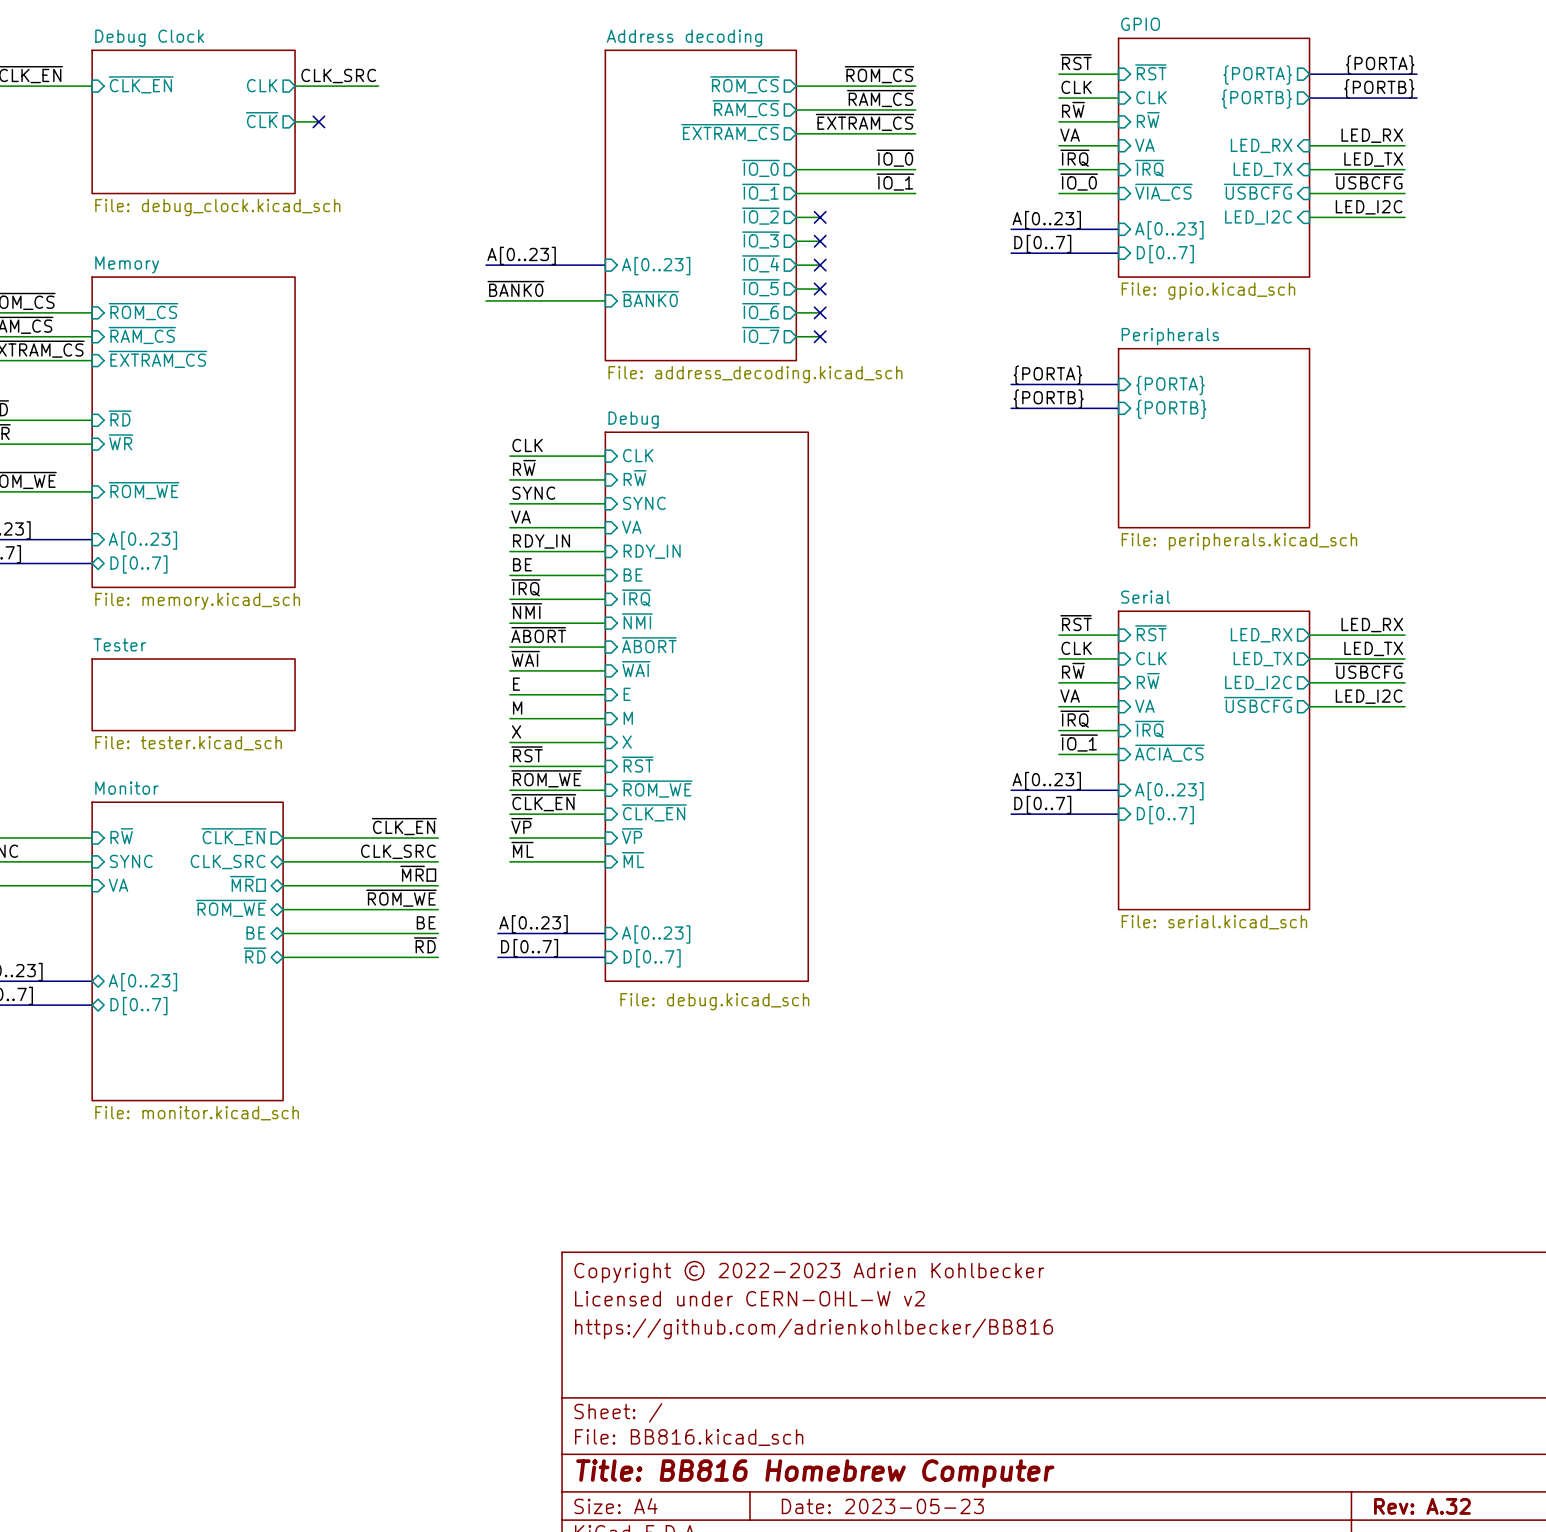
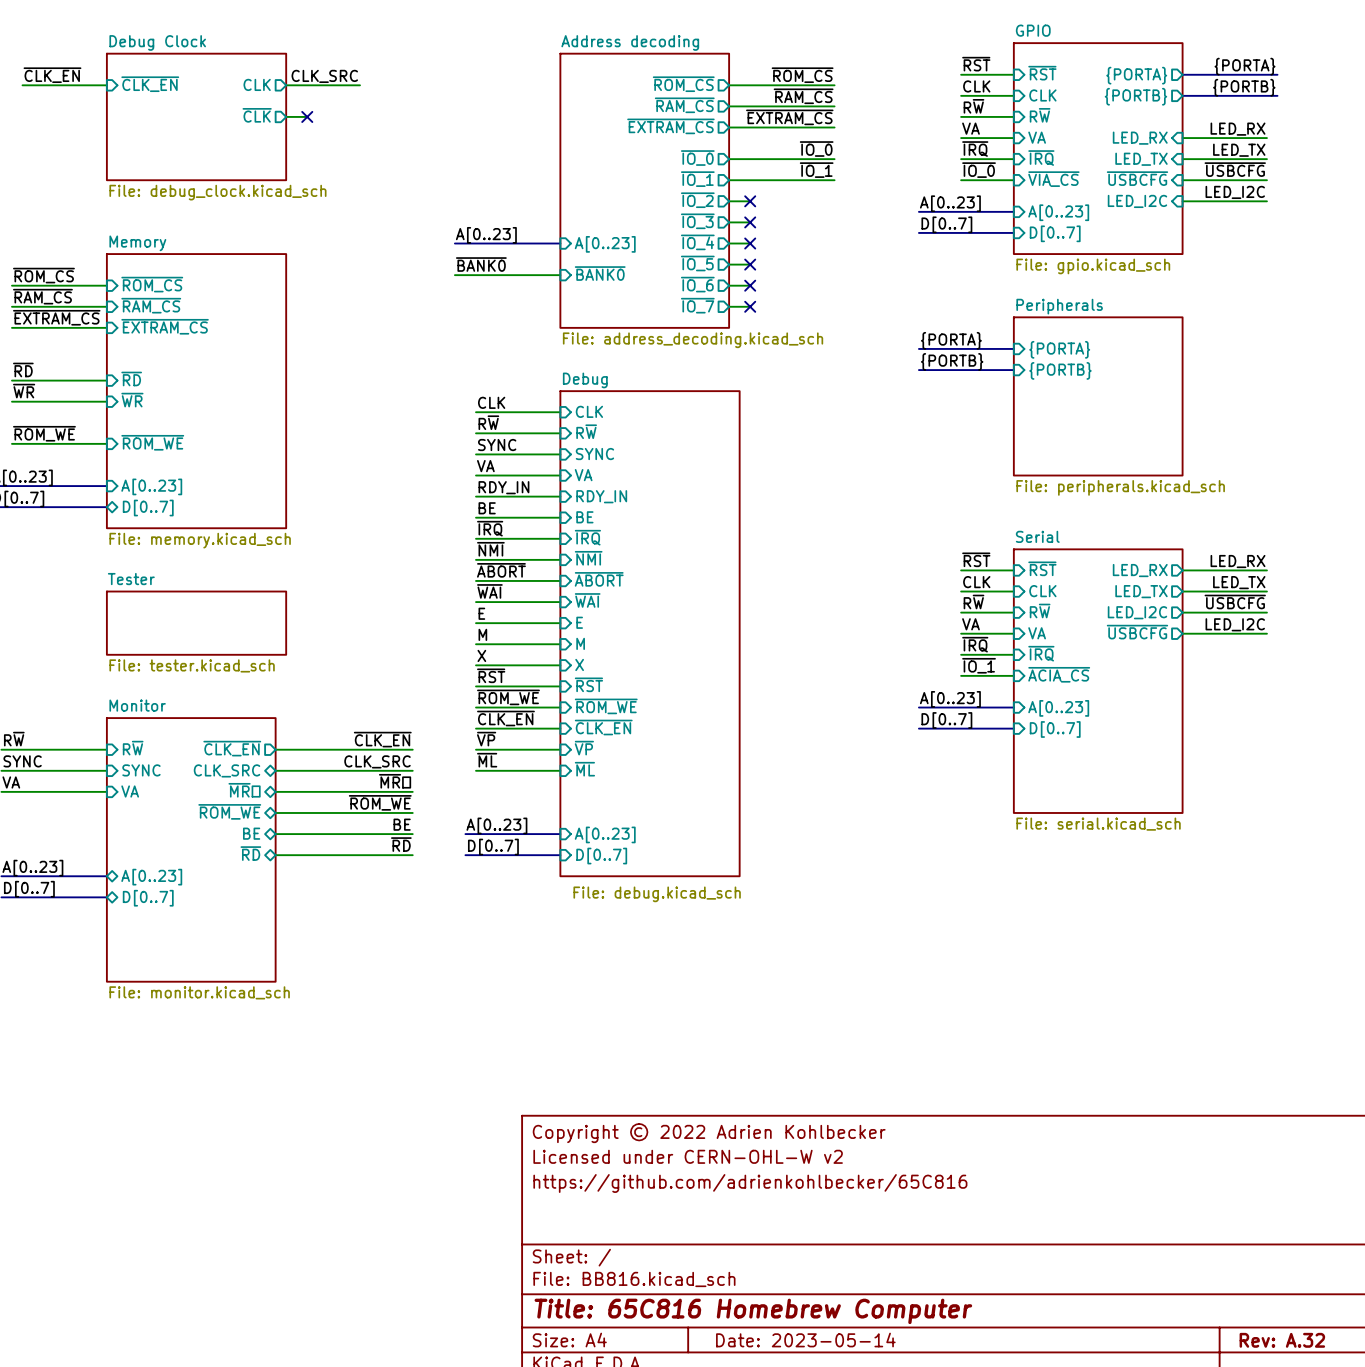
title block: Copyright © 2022-2023 Adrien Kohlbecker (809, 1271) -> Copyright © 2022 Adrien Kohlbecker (709, 1133)
title block: https://github.com/adrienkohlbecker/BB816 (814, 1328) -> https://github.com/adrienkohlbecker/65C816 (750, 1183)
title block: Title: BB816 Homebrew Computer (815, 1473) -> Title: 65C816 Homebrew Computer (753, 1311)
title block: Date: 2023-05-23 (882, 1506) -> Date: 2023-05-14 (805, 1340)

